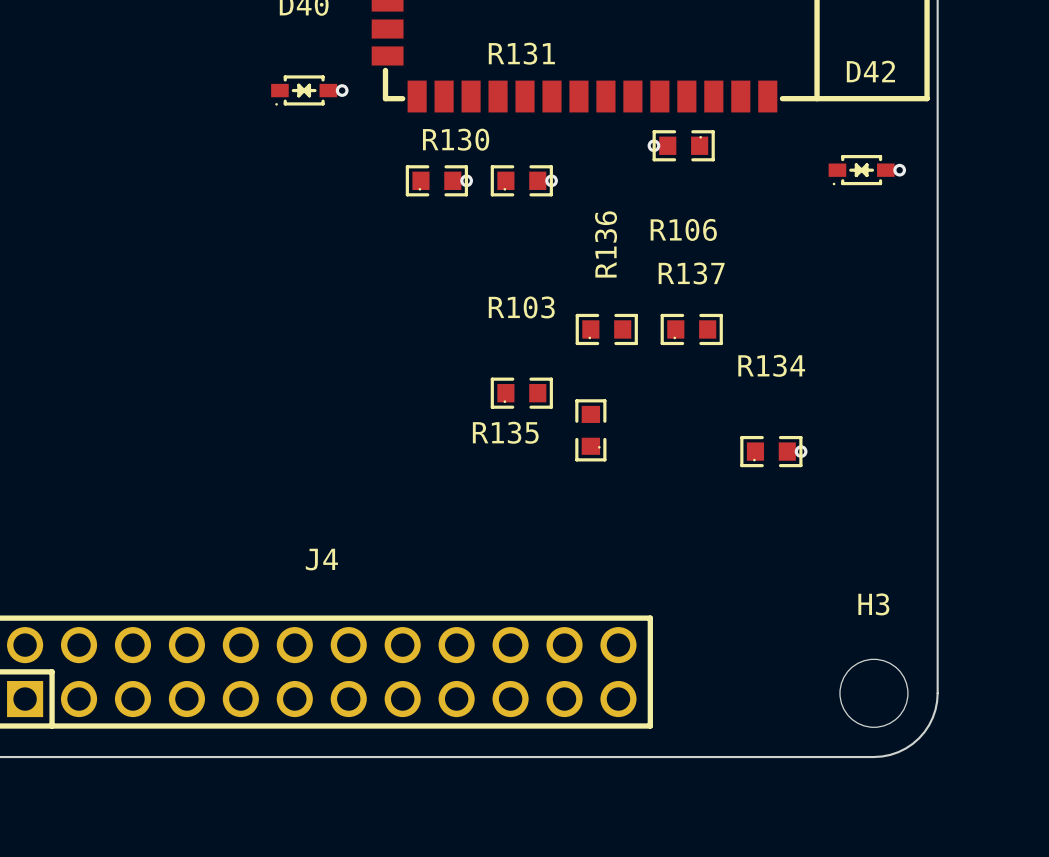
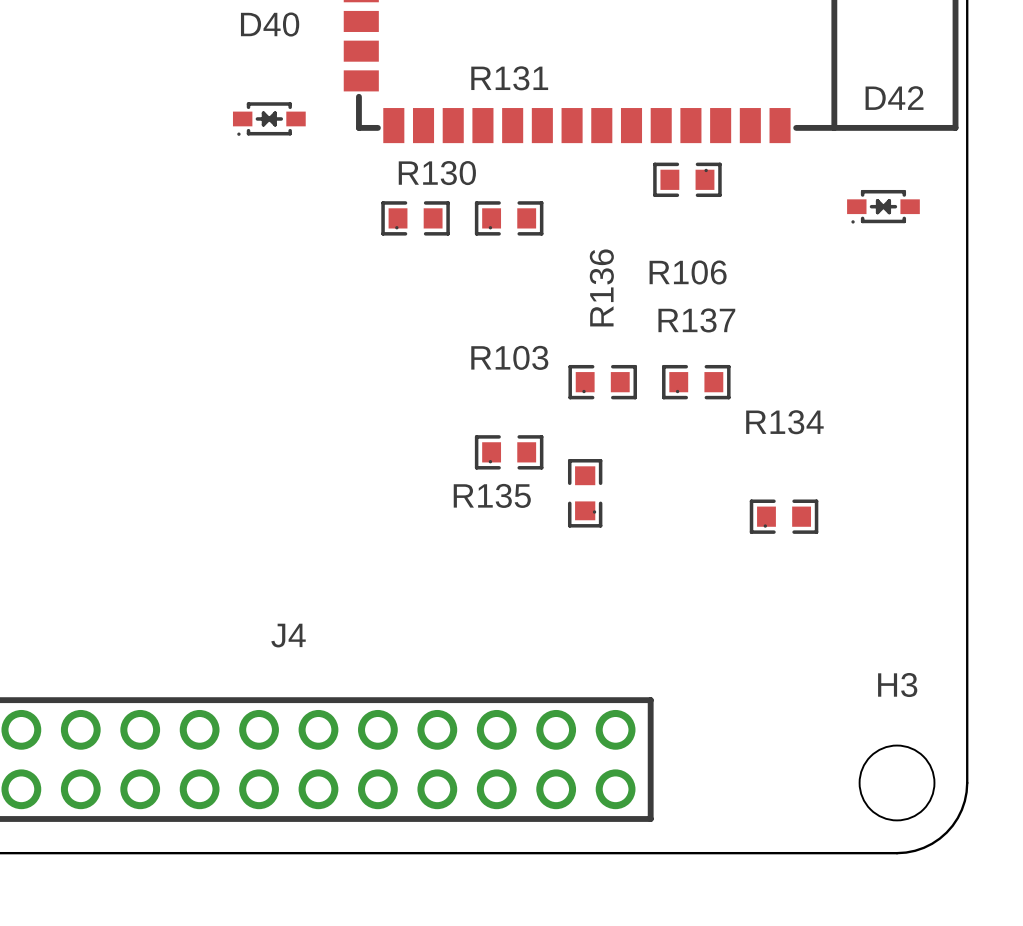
via: (342, 90) -> none
via: (653, 145) -> none
via: (899, 170) -> none
via: (466, 180) -> none
via: (551, 180) -> none
via: (801, 451) -> none

